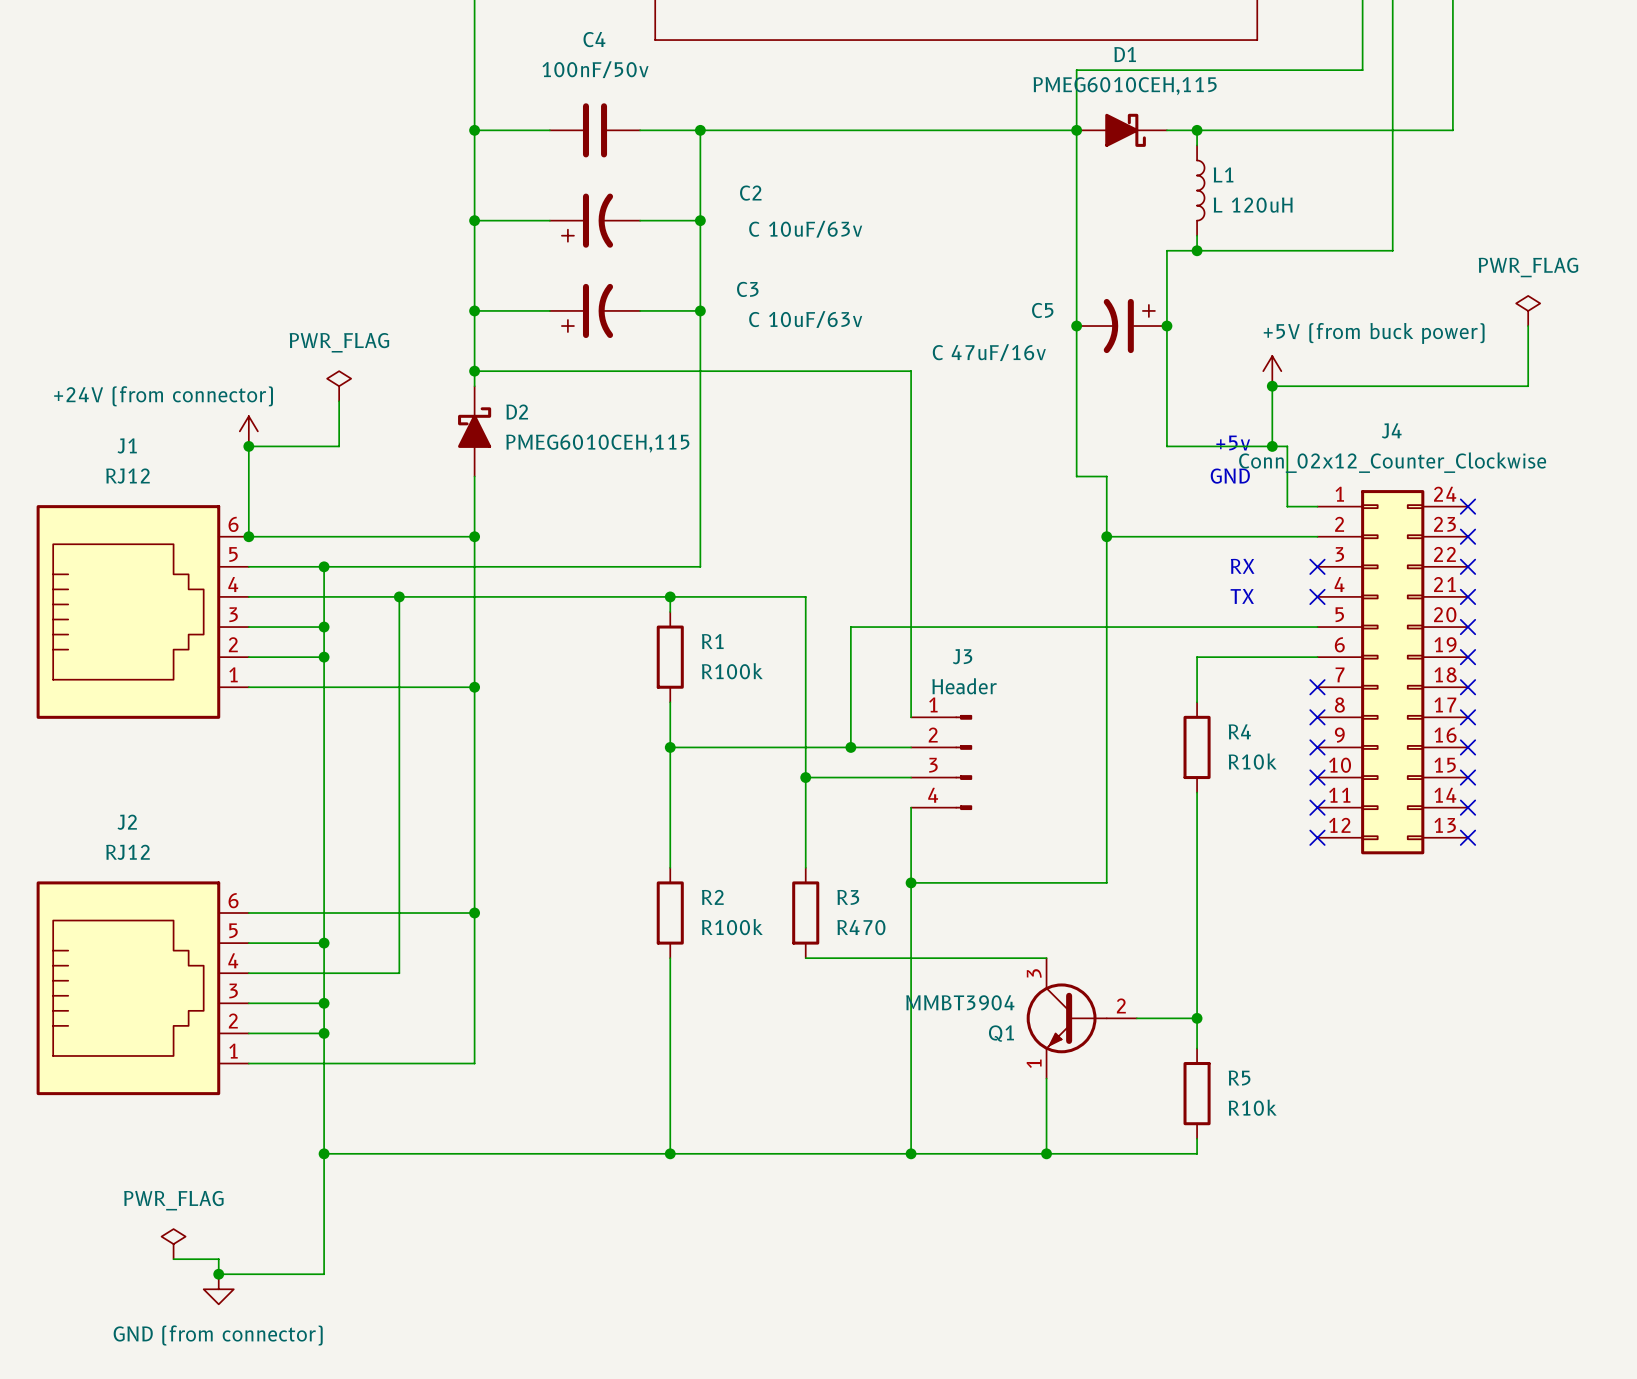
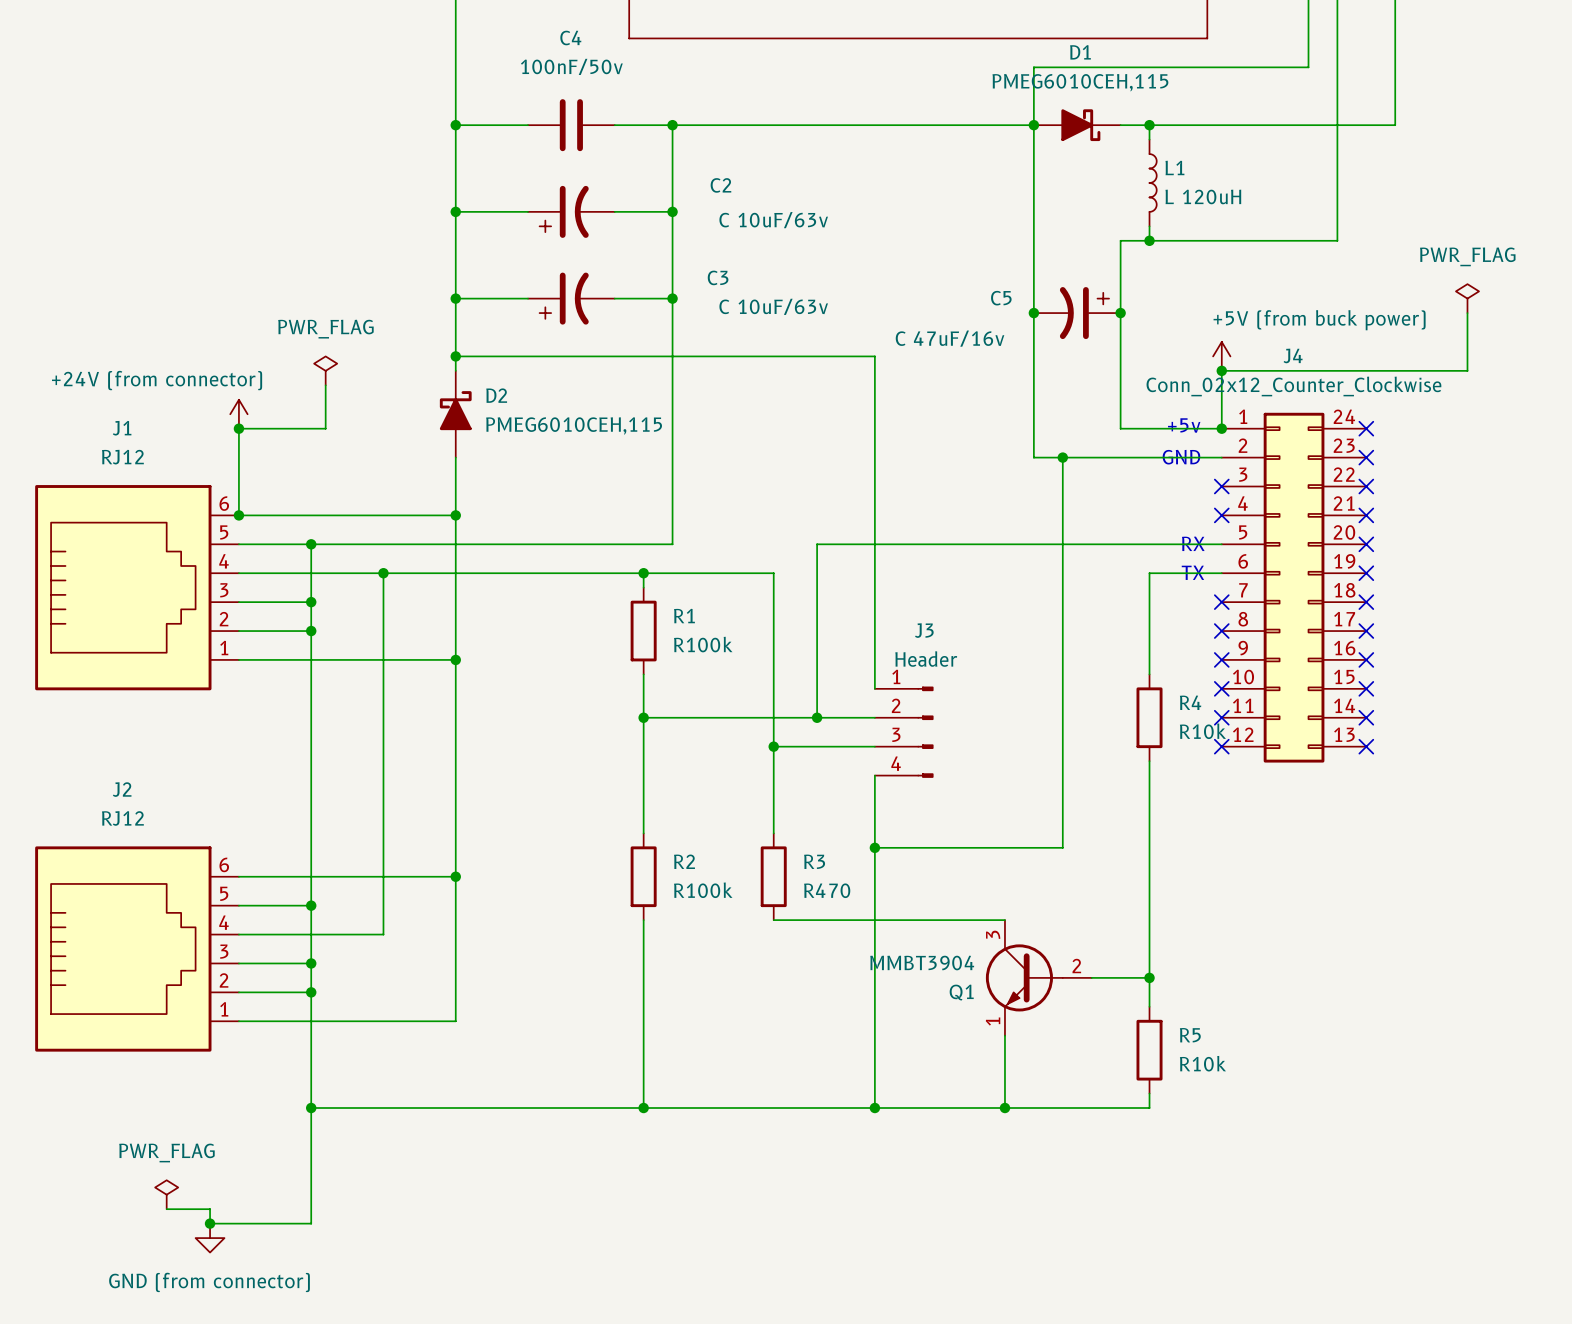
wire: (1272, 446) (1287, 446) (1287, 506) (1317, 506) -> none
no-connect mark: none -> (1366, 428)
wire: none -> (1062, 457) (1221, 457)
no-connect mark: none -> (1366, 457)
no-connect mark: none -> (1221, 486)
no-connect mark: none -> (1366, 486)
no-connect mark: (1467, 506) -> none
wire: (1106, 536) (1317, 536) -> none
junction position: (1106, 536) -> (1062, 457)
no-connect mark: none -> (1221, 515)
no-connect mark: none -> (1366, 515)
no-connect mark: (1467, 536) -> none
no-connect mark: (1317, 566) -> none
no-connect mark: none -> (1366, 544)
no-connect mark: (1467, 566) -> none
no-connect mark: (1317, 596) -> none
no-connect mark: none -> (1366, 573)
no-connect mark: (1467, 596) -> none
wire: (850, 627) (1317, 627) -> (817, 602) (817, 544) (1221, 544)
no-connect mark: none -> (1221, 602)
no-connect mark: none -> (1366, 602)
no-connect mark: (1467, 627) -> none
wire: (1197, 657) (1317, 657) -> (1149, 631) (1149, 573) (1221, 573)
no-connect mark: none -> (1221, 631)
no-connect mark: none -> (1366, 631)
no-connect mark: (1467, 657) -> none
J4 position: (1392, 672) -> (1294, 587)
no-connect mark: none -> (1221, 659)
no-connect mark: (1317, 687) -> none
no-connect mark: none -> (1366, 659)
no-connect mark: (1467, 687) -> none
no-connect mark: none -> (1221, 688)
no-connect mark: (1317, 717) -> none
no-connect mark: none -> (1366, 688)
no-connect mark: (1467, 717) -> none
no-connect mark: none -> (1221, 717)
no-connect mark: (1317, 747) -> none
no-connect mark: none -> (1366, 717)
no-connect mark: (1467, 747) -> none
no-connect mark: none -> (1221, 746)
no-connect mark: (1317, 777) -> none
no-connect mark: none -> (1366, 746)
no-connect mark: (1467, 777) -> none
no-connect mark: (1317, 807) -> none
no-connect mark: (1467, 807) -> none
no-connect mark: (1317, 837) -> none
no-connect mark: (1467, 837) -> none

